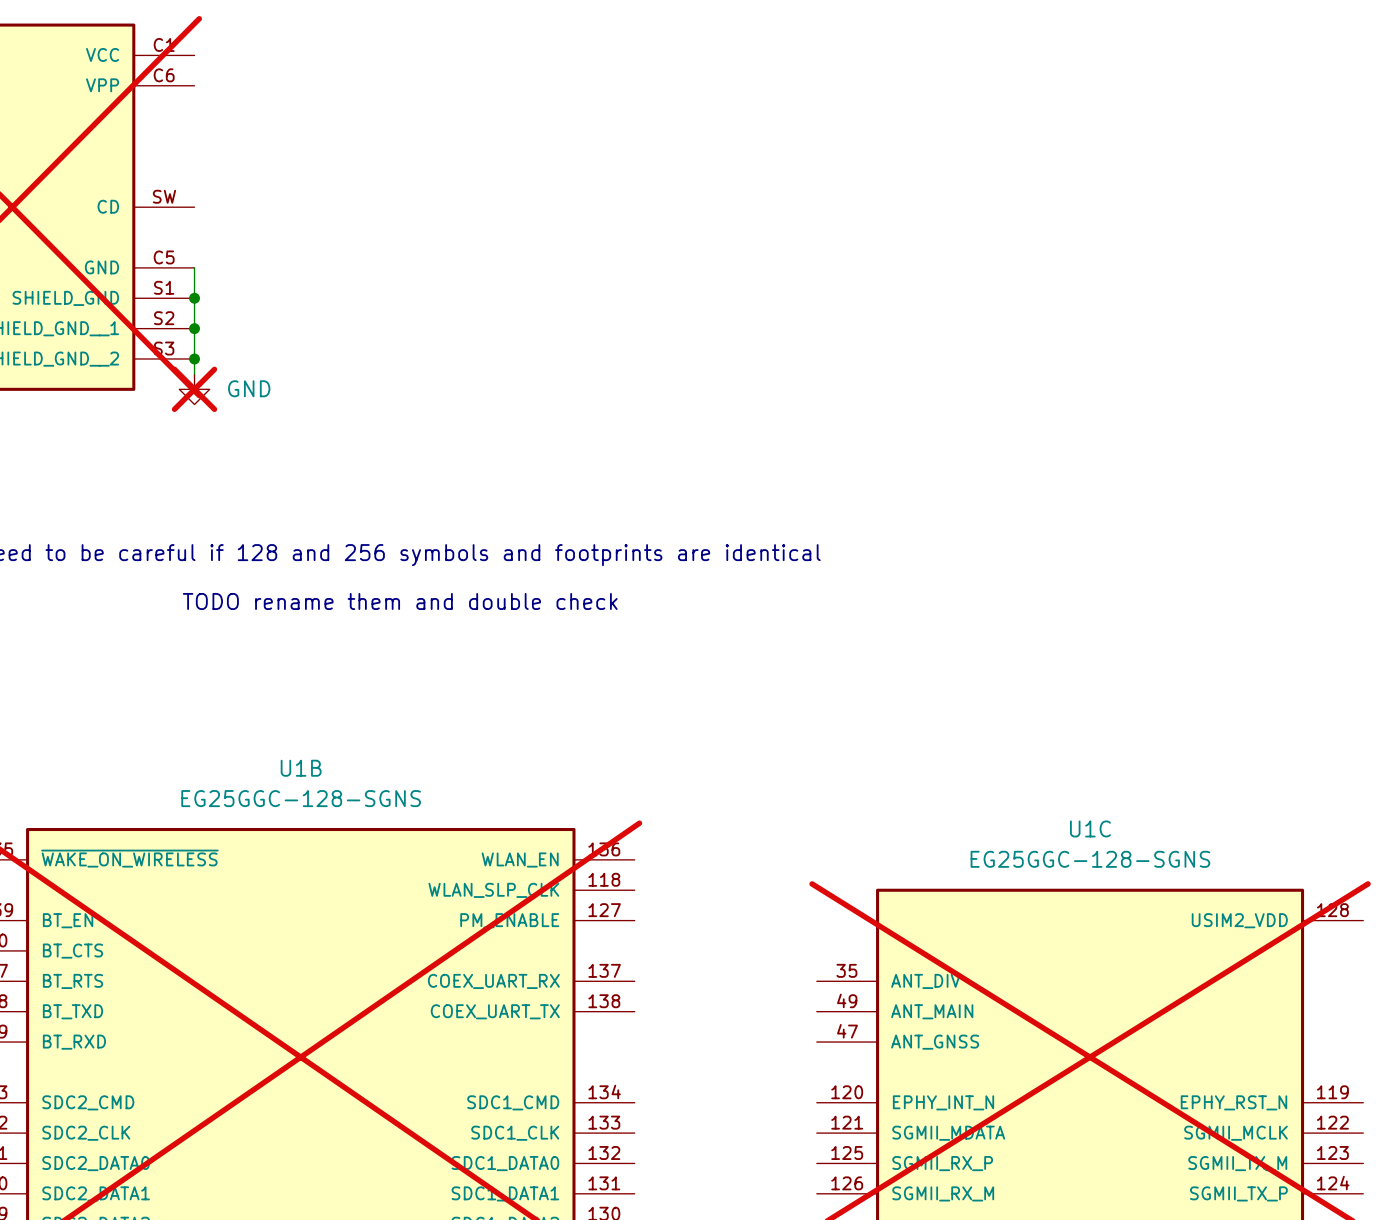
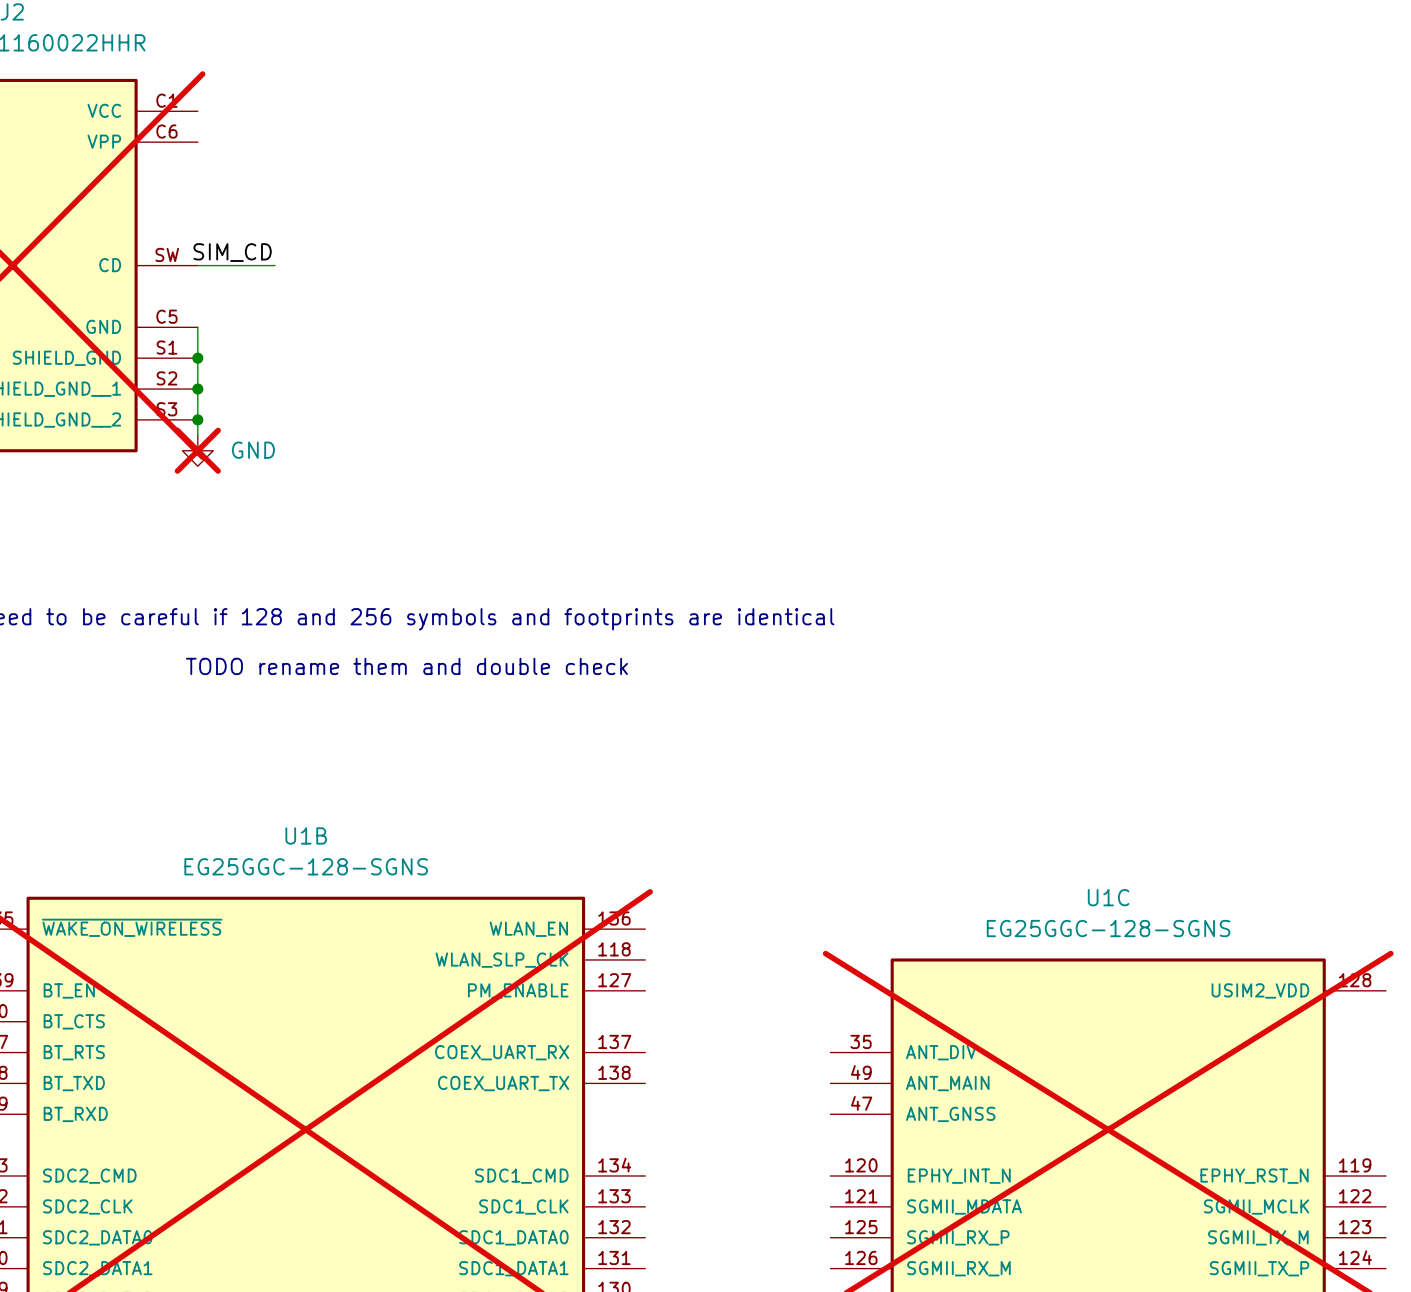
label: none -> SIM_CD (232, 252)
wire: none -> (197, 265) (274, 265)

